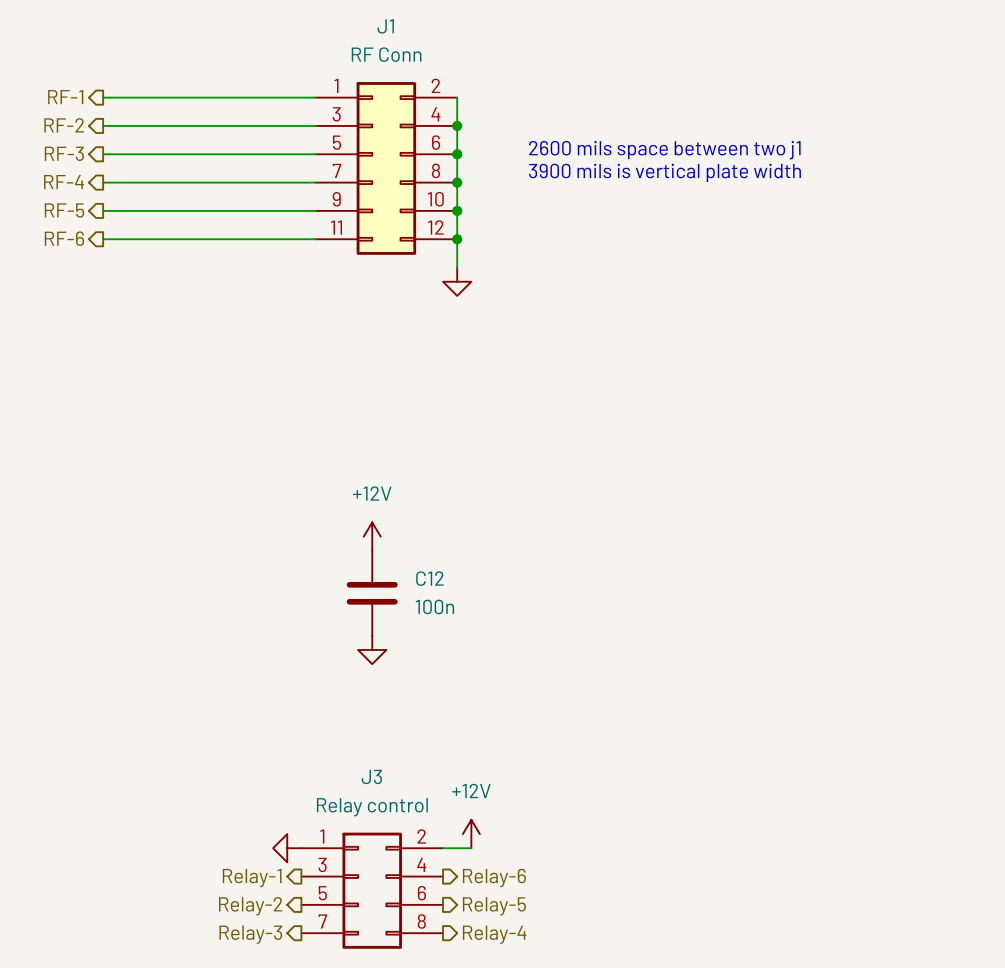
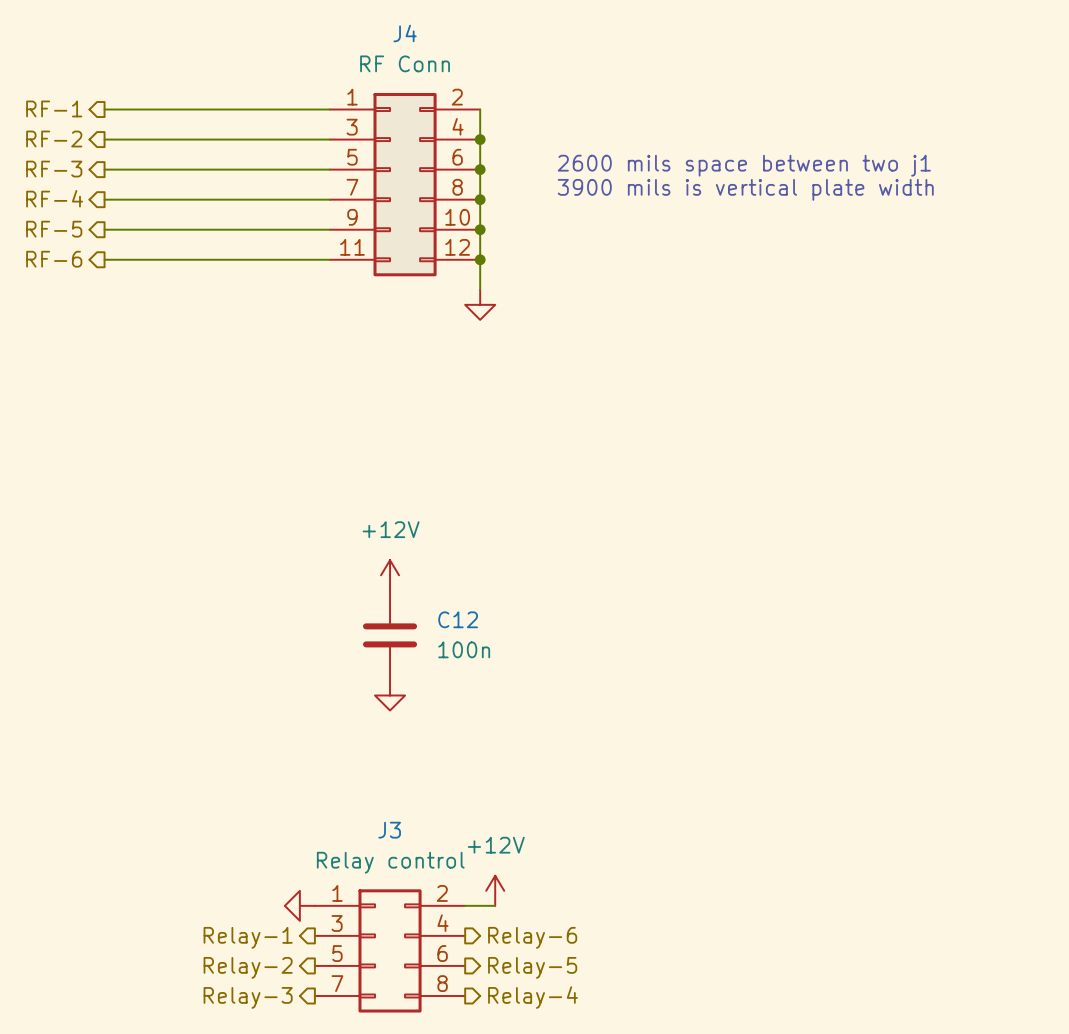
J1 name: J1 (385, 26) -> J4 (405, 33)

